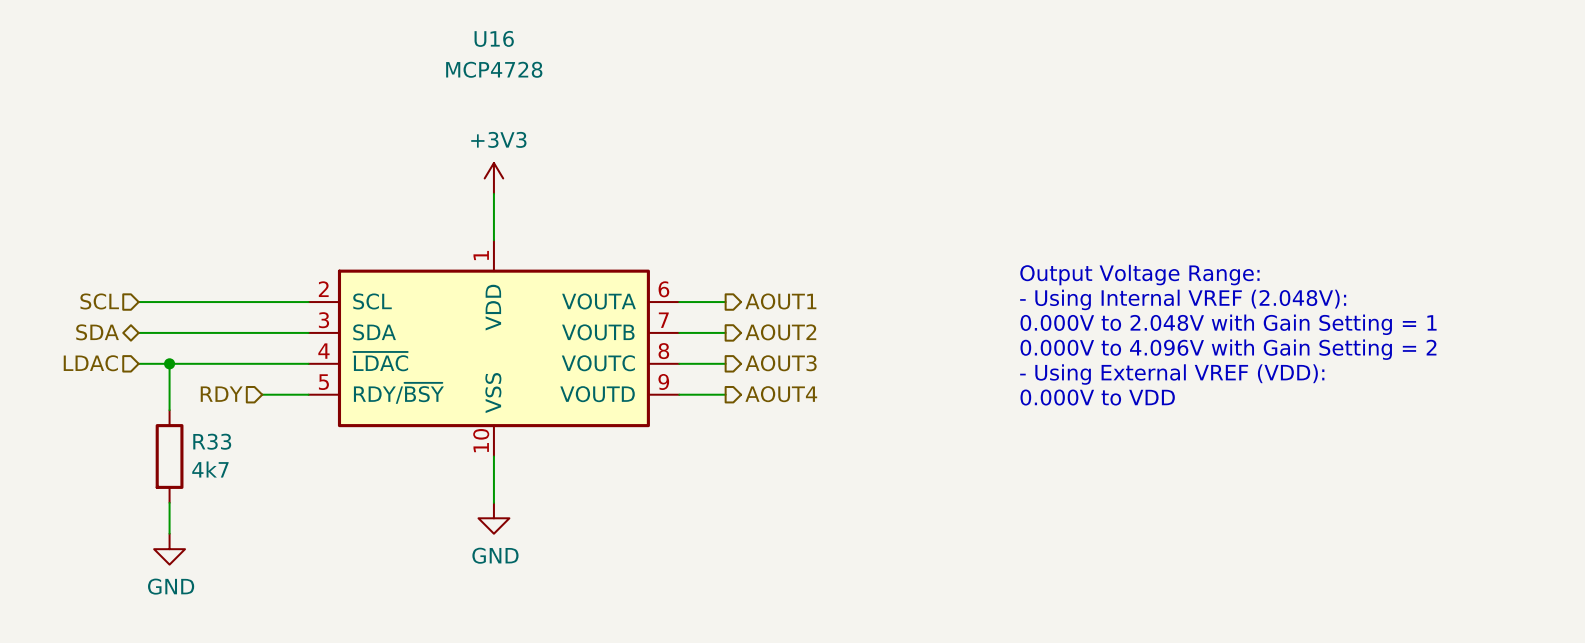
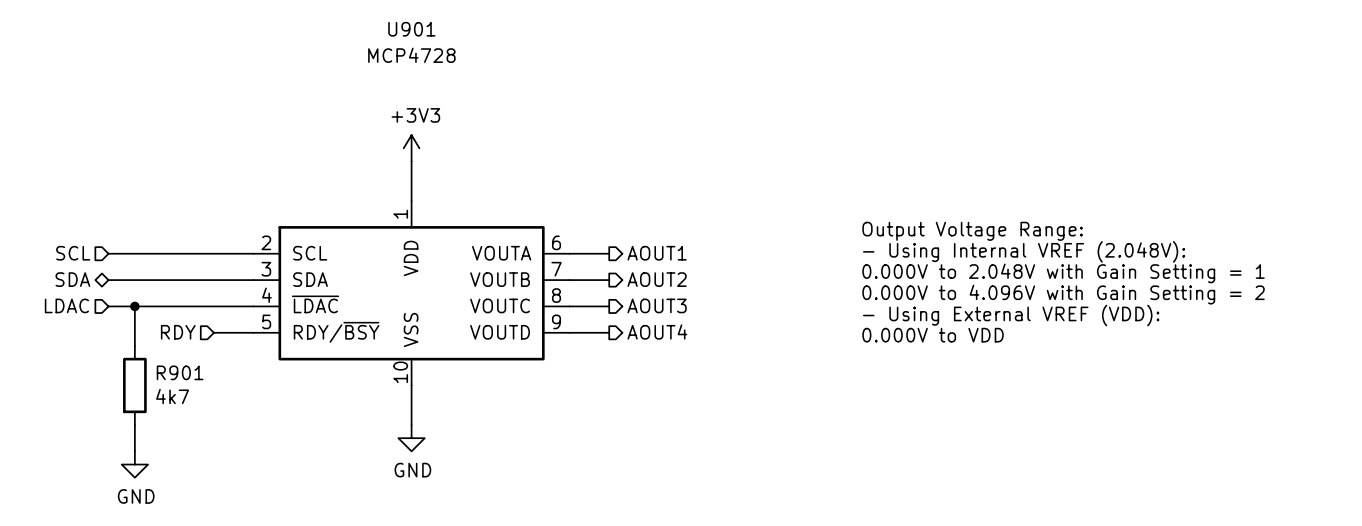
U16 name: U16 (494, 38) -> U901 (411, 29)
R33 name: R33 (212, 441) -> R901 (180, 372)

